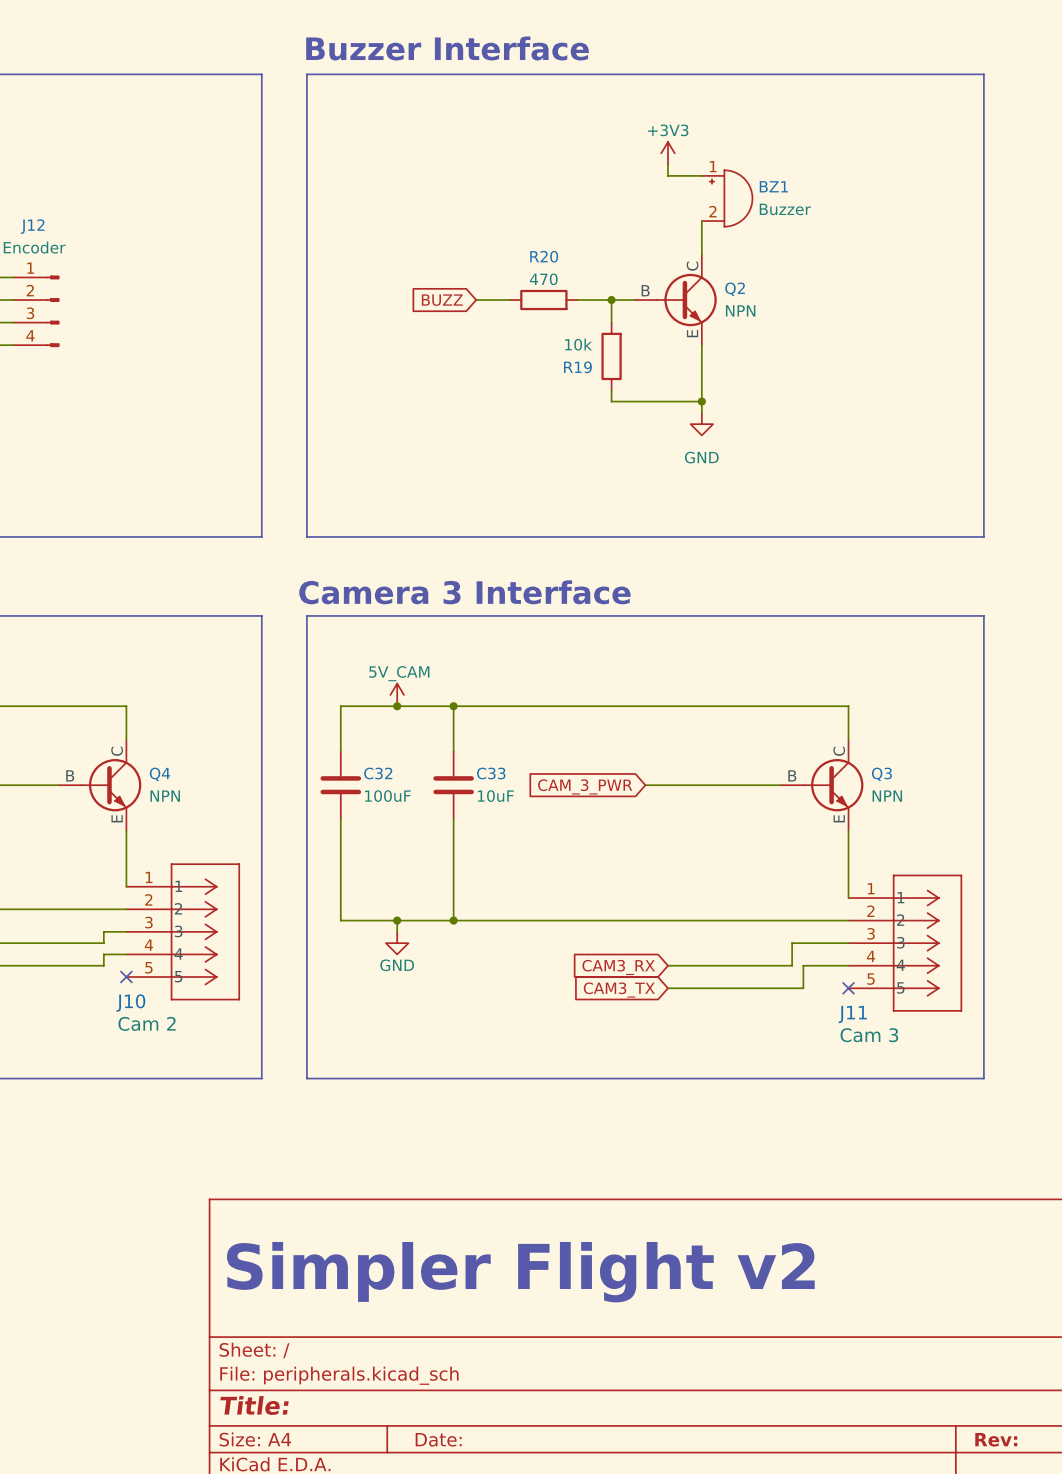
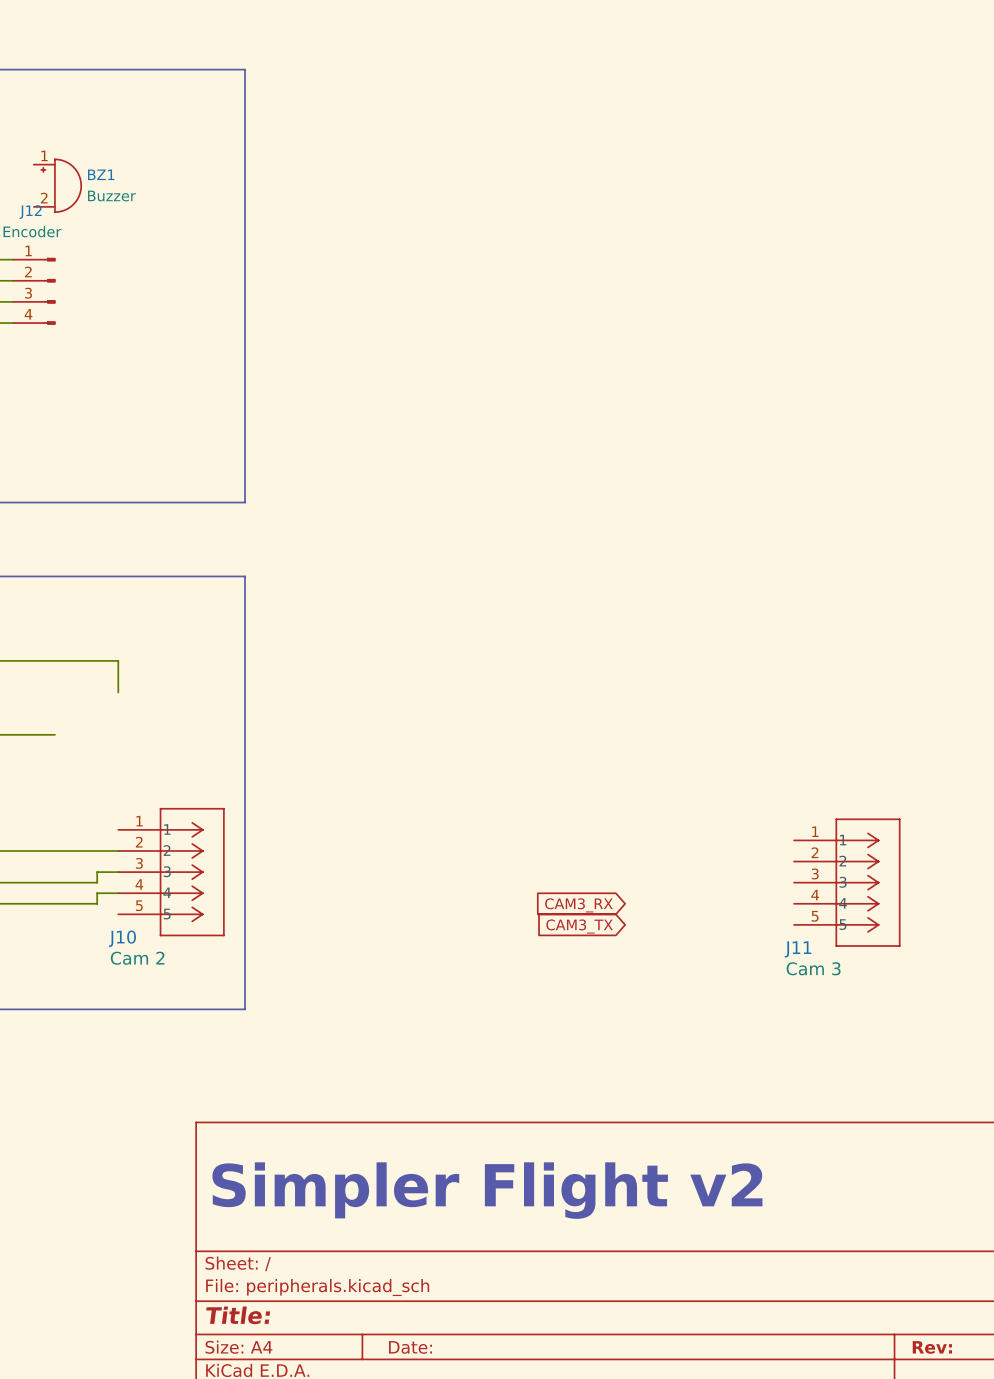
text: Buzzer Interface (447, 48) -> none
line: (306, 74) (983, 74) (983, 536) (306, 536) (306, 74) -> none
power symbol: +3V3 (667, 153) -> none
wire: (667, 164) (667, 175) (701, 175) -> none
BZ1 position: (727, 198) -> (57, 185)
wire: (701, 221) (701, 254) -> none
global label: BUZZ (442, 300) -> none
wire: (476, 300) (510, 300) -> none
R20: 470 (543, 300) -> none
wire: (577, 300) (634, 300) -> none
wire: (611, 300) (611, 322) -> none
junction: (611, 300) -> none
Q2: NPN (675, 300) -> none
wire: (701, 345) (701, 412) -> none
R19: 10k (611, 356) -> none
wire: (611, 390) (611, 401) (701, 401) -> none
junction: (701, 401) -> none
power symbol: GND (701, 424) -> none
text: Camera 3 Interface (464, 592) -> none
line: (306, 615) (983, 615) (983, 1078) (306, 1078) (306, 615) -> none
power symbol: 5V_CAM (397, 694) -> none
junction: (397, 706) -> none
wire: (453, 706) (453, 751) -> none
junction: (453, 706) -> none
wire: (848, 740) (848, 706) (340, 706) (340, 751) -> none
Q4: NPN (100, 785) -> none
C32: 100uF (340, 785) -> none
C33: 10uF (453, 785) -> none
wire: (645, 785) (780, 785) -> none
Q3: NPN (822, 785) -> none
global label: CAM_3_PWR (585, 786) -> none
wire: (340, 819) (340, 920) (848, 920) -> none
wire: (453, 819) (453, 920) -> none
wire: (126, 830) (126, 886) -> none
wire: (848, 830) (848, 898) -> none
wire: (397, 920) (397, 931) -> none
junction: (397, 920) -> none
junction: (453, 920) -> none
power symbol: GND (397, 943) -> none
wire: (848, 943) (792, 943) (792, 965) (667, 965) -> none
wire: (848, 965) (803, 965) (803, 988) (667, 988) -> none
no-connect mark: (126, 977) -> none
no-connect mark: (848, 988) -> none

